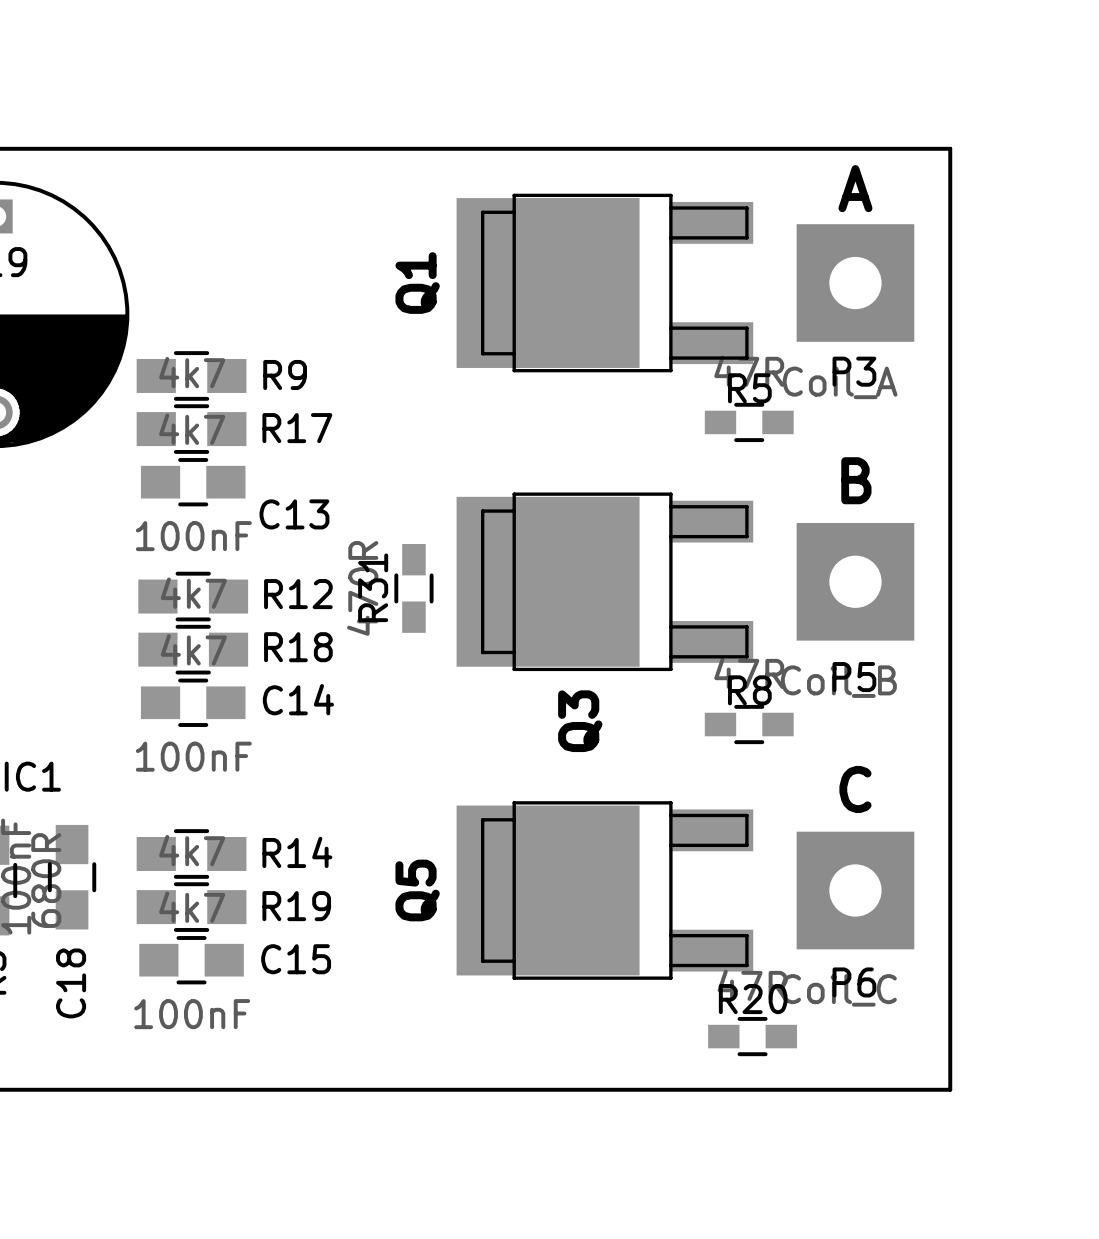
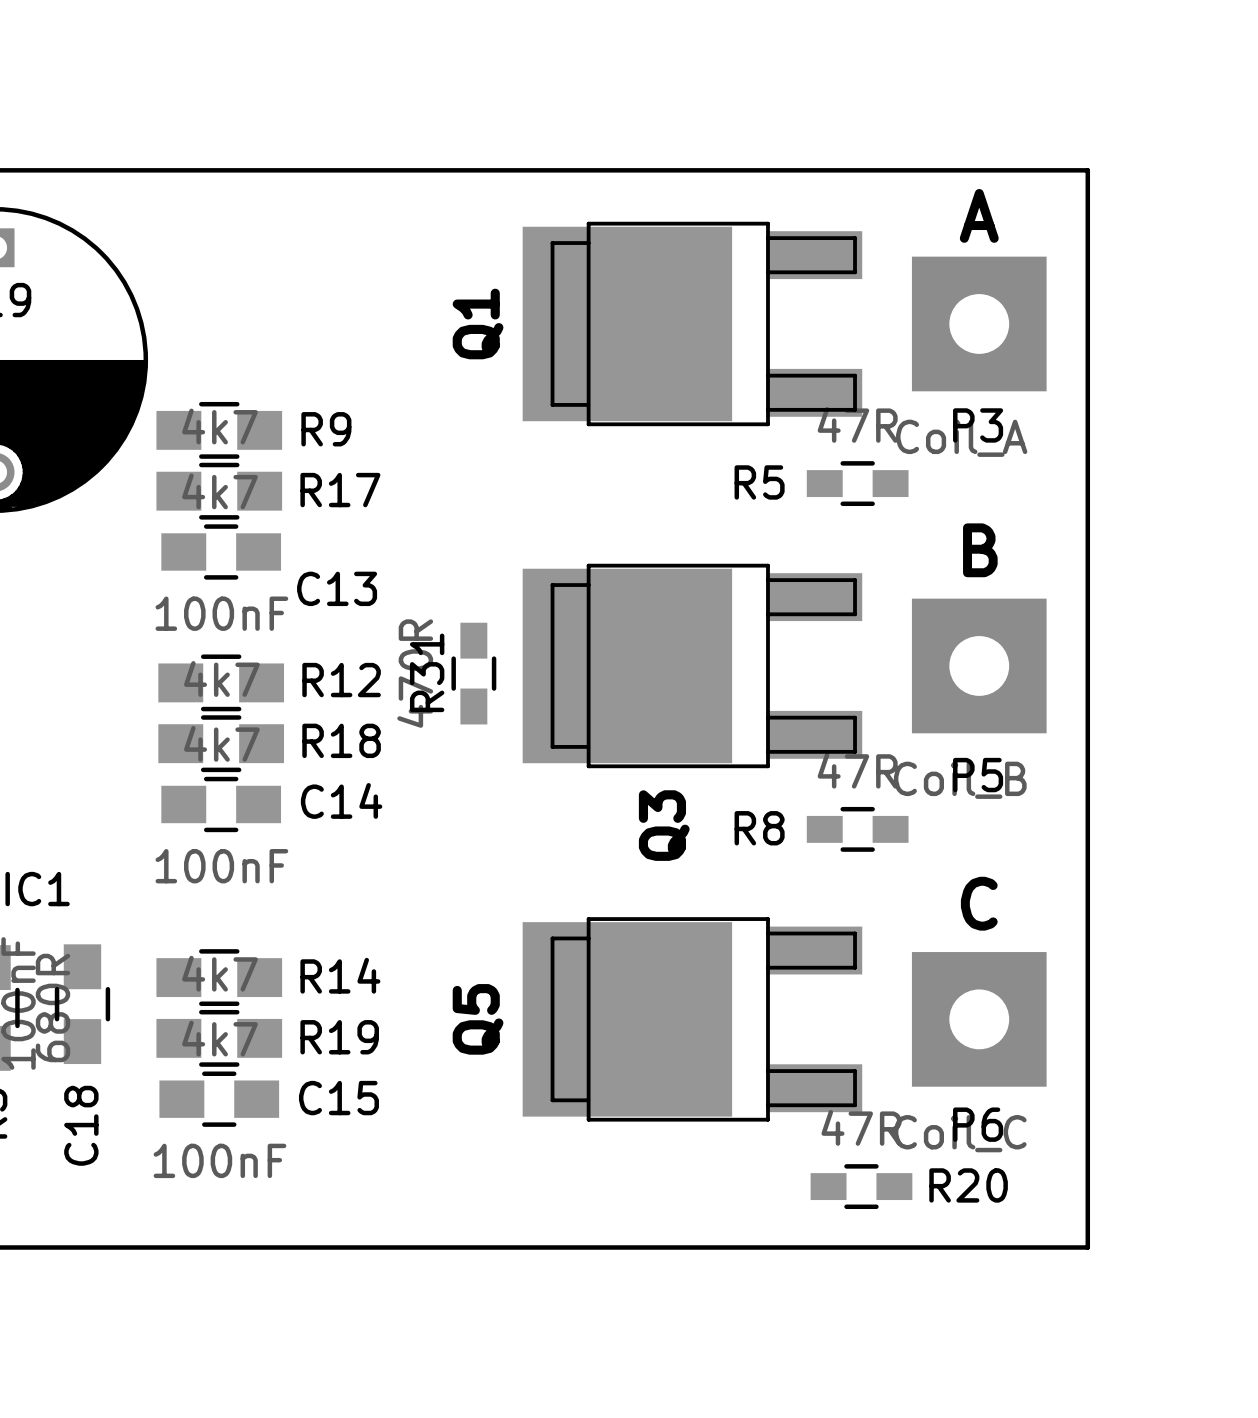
R5 name position: R5 (749, 388) -> R5 (759, 482)
R8 name position: R8 (749, 690) -> R8 (759, 828)
R20 name position: R20 (753, 999) -> R20 (968, 1185)

